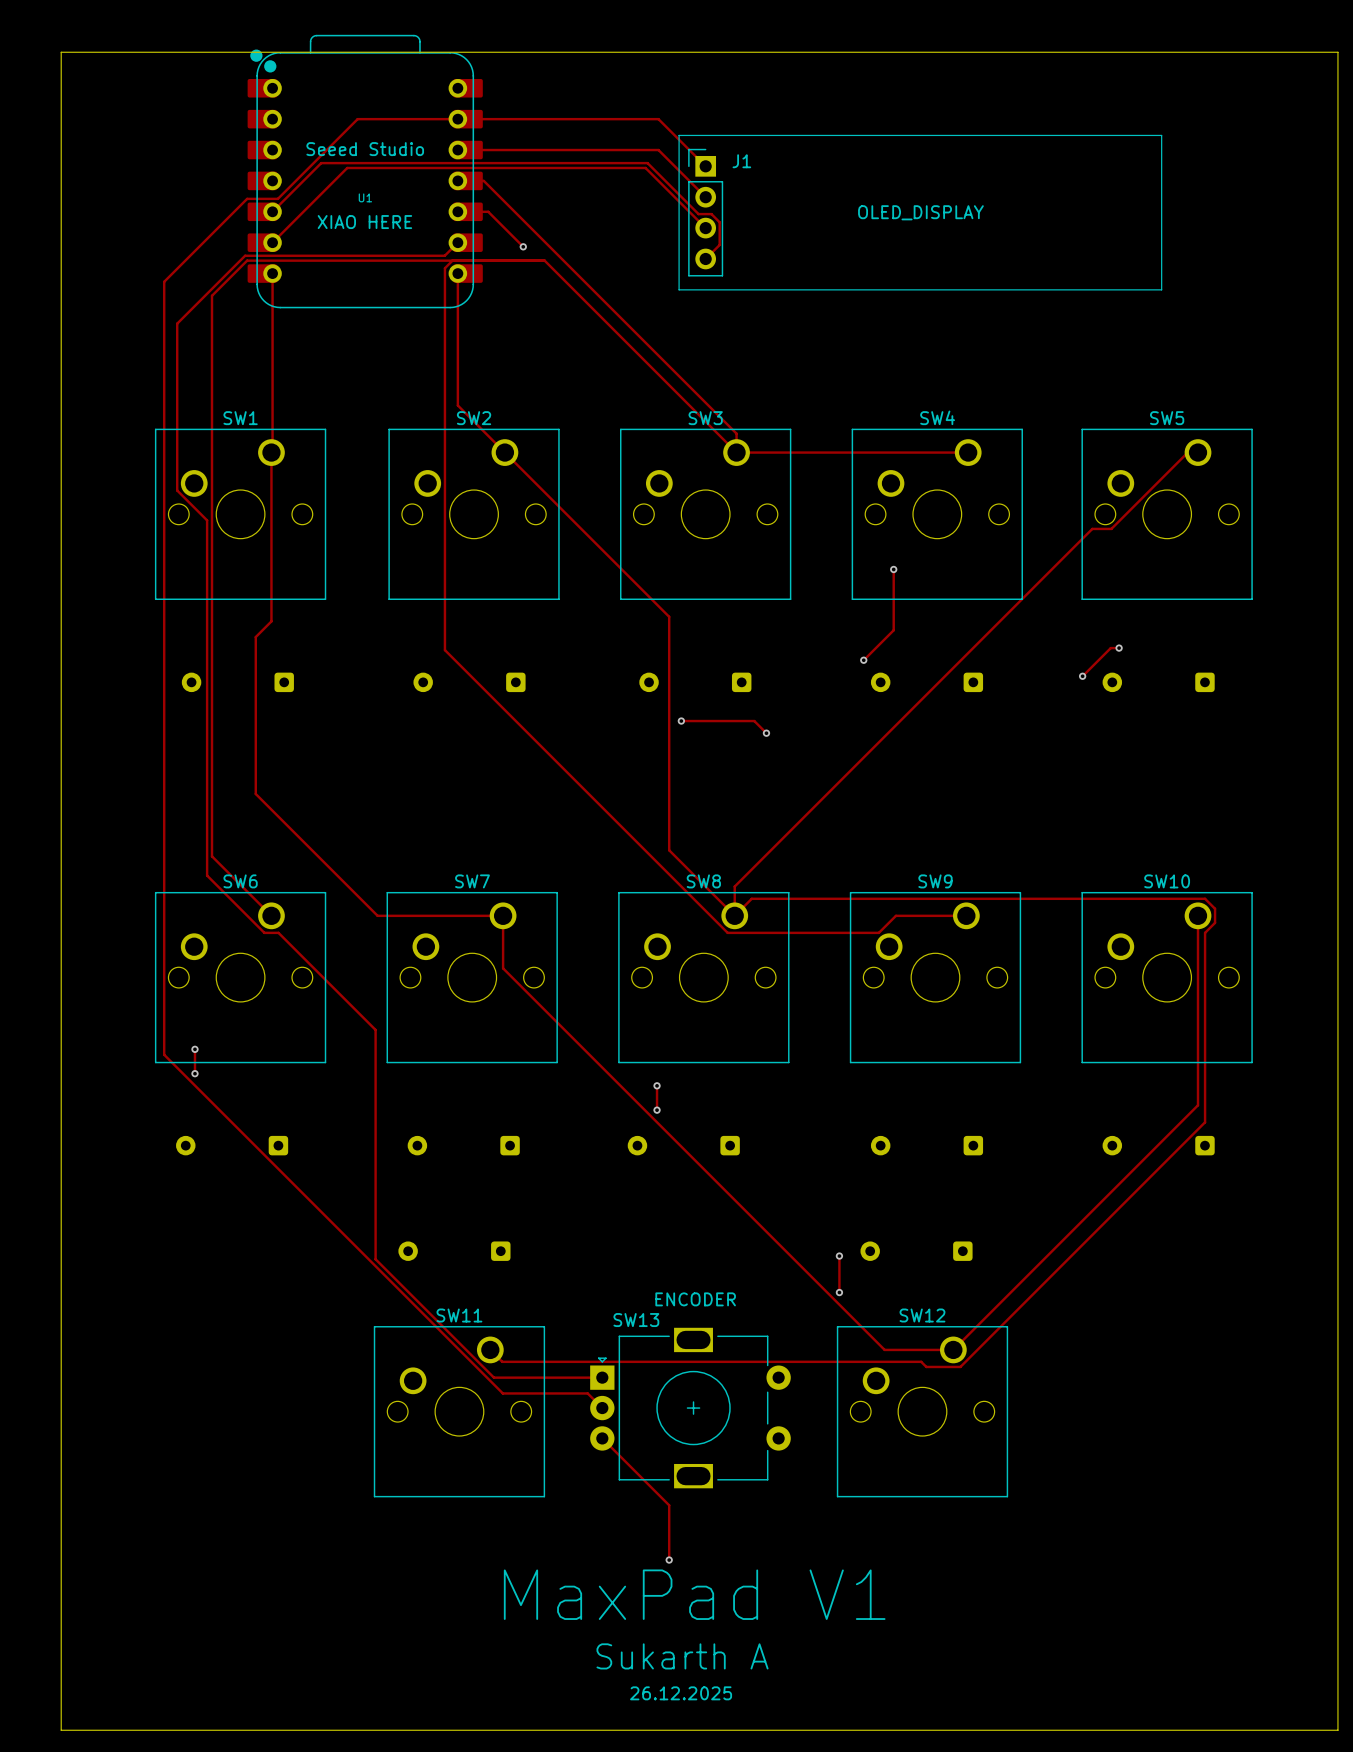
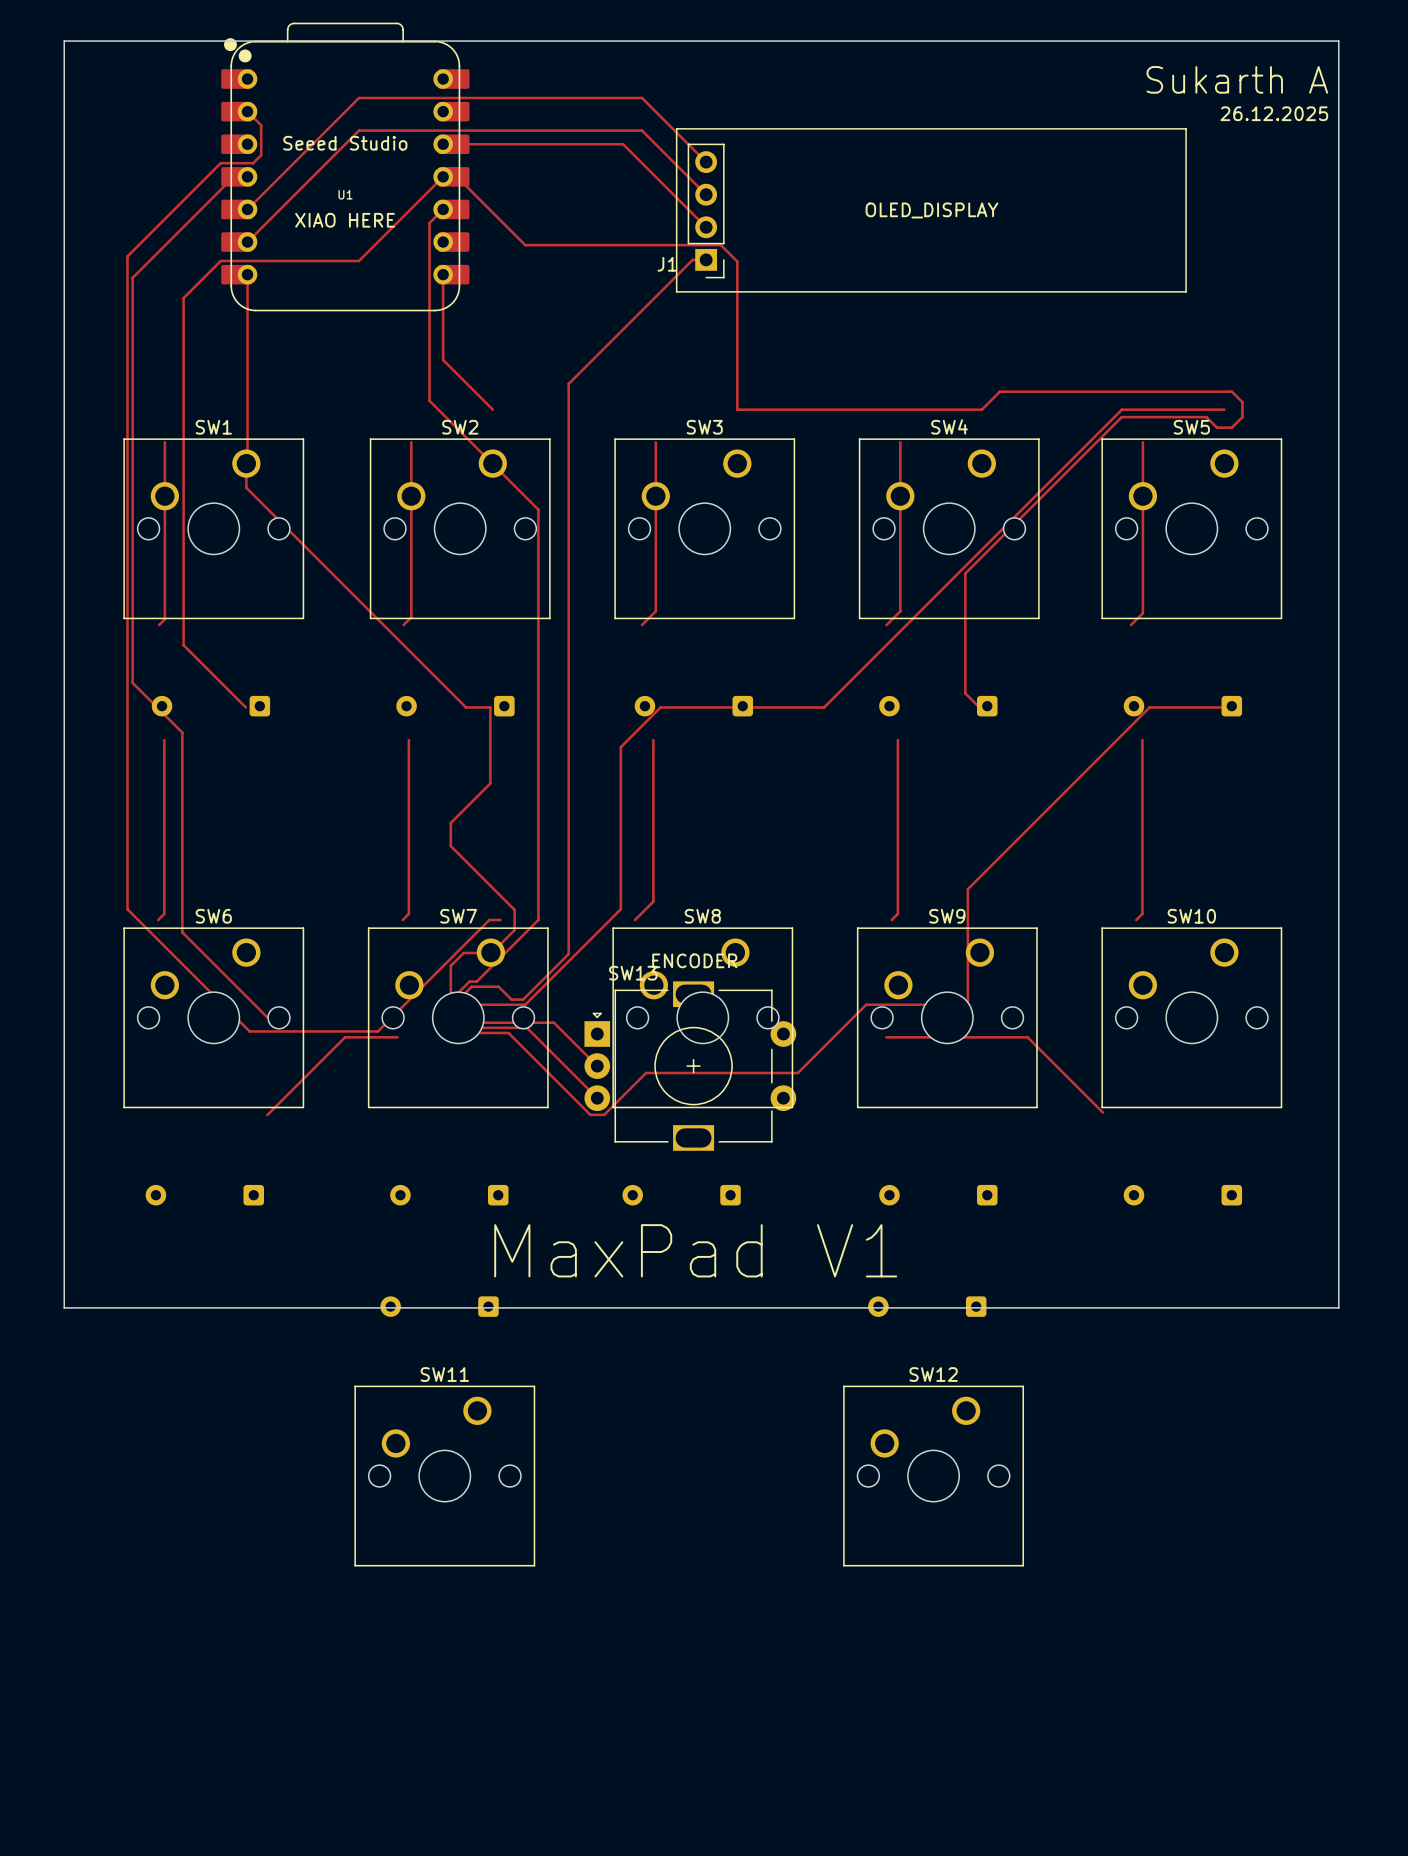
board edge: (98, 52) (61, 52) (61, 1730) (1337, 1730) (1337, 52) (1306, 52) -> (64, 41) (64, 1307) (1338, 1307) (1338, 41)
text: none -> Sukarth A (1237, 79)
track: none -> (247, 111) (261, 125) (261, 155) (253, 163) (220, 163) (127, 256) (127, 909) (249, 1031) (377, 1031) (489, 920) (500, 920)
text: none -> 26.12.2025 (1274, 113)
track: (628, 150) (658, 150) (705, 197) -> (623, 144) (706, 227)
track: (321, 163) (647, 163) (698, 214) (711, 214) (719, 222) (719, 244) (705, 258) -> (298, 158) (358, 98) (642, 98) (706, 162)
track: (705, 166) (658, 119) (357, 119) (277, 198) (247, 198) (164, 281) (164, 1054) (502, 1393) (587, 1393) (602, 1408) -> none
track: (347, 167) (645, 167) (705, 228) -> (326, 163) (358, 130) (642, 130) (706, 194)
track: none -> (247, 176) (233, 176) (132, 277) (132, 682) (182, 732) (182, 932) (267, 1017)
track: (470, 180) (483, 180) (736, 433) (736, 452) -> (456, 176) (525, 245) (720, 245) (737, 261) (737, 409) (981, 409) (999, 391) (1231, 391) (1242, 402) (1242, 417) (1231, 427) (1216, 427) (1206, 417) (1121, 417) (965, 573) (965, 693) (979, 707)
track: (457, 211) (488, 211) (523, 246) -> none
J1 rotation: 0° (705, 212) -> 180° (706, 210)
track: (457, 242) (444, 255) (245, 255) (177, 323) (177, 490) (207, 520) (207, 875) (264, 932) (278, 932) (375, 1029) (375, 1259) (493, 1377) (602, 1377) -> none
via: (523, 246) -> none
track: none -> (706, 259) (692, 259) (568, 383) (568, 954) (523, 999) (511, 999) (498, 986) (471, 986) (461, 997) (461, 1012) (471, 1022) (553, 1022) (597, 1066)
track: (378, 260) (544, 260) (736, 452) -> (358, 261) (443, 176)
track: (452, 260) (444, 268) -> (443, 209) (429, 223) (429, 269)
track: (457, 354) (457, 405) (669, 616) (669, 850) (734, 915) -> (443, 360) (492, 409)
track: (444, 393) (444, 650) (727, 932) (878, 932) (895, 915) (966, 915) -> (429, 400) (538, 509) (538, 919) (476, 981) (469, 981) (455, 995) (455, 1014) (469, 1027) (526, 1027) (597, 1098)
track: none -> (1224, 409) (1121, 409) (824, 707) (660, 707) (620, 747) (620, 909) (525, 1004) (479, 1004)
track: none -> (164, 442) (164, 619) (159, 625)
track: none -> (411, 442) (411, 617) (403, 625)
track: none -> (655, 442) (655, 611) (642, 625)
track: none -> (900, 442) (900, 611) (886, 625)
track: none -> (1142, 442) (1142, 613) (1131, 625)
track: (736, 452) (968, 452) -> none
track: (1198, 452) (1187, 452) (1111, 528) (1092, 528) (734, 886) (734, 915) -> none
track: (271, 475) (271, 621) (255, 637) (255, 793) (377, 915) (503, 915) (503, 968) (884, 1349) (953, 1349) (1198, 1105) (1198, 915) -> (246, 487) (466, 707) (490, 707) (490, 783) (450, 823) (450, 846) (514, 909) (514, 930) (491, 952) (463, 952) (450, 965) (450, 1016) (467, 1032) (508, 1032) (590, 1114) (604, 1114) (646, 1073) (797, 1073) (866, 1004) (967, 1004) (967, 889) (1149, 707) (1223, 707)
track: (893, 569) (893, 630) (863, 660) -> none
via: (893, 569) -> none
track: (211, 624) (211, 856) (271, 915) -> (183, 645) (245, 707)
track: (1119, 648) (1110, 648) (1082, 676) -> none
via: (1119, 648) -> none
via: (863, 660) -> none
via: (1082, 676) -> none
track: none -> (164, 740) (164, 913) (158, 920)
track: none -> (408, 740) (408, 913) (402, 920)
track: none -> (653, 740) (653, 901) (635, 920)
track: none -> (897, 740) (897, 913) (891, 920)
track: none -> (1142, 740) (1142, 913) (1136, 920)
track: (681, 721) (754, 721) (766, 733) -> none
via: (681, 721) -> none
via: (766, 733) -> none
track: (734, 915) (751, 898) (1205, 898) (1215, 908) (1215, 922) (1205, 932) (1205, 1122) (960, 1366) (926, 1366) (921, 1361) (502, 1361) (490, 1349) -> none
text: none -> ENCODER (694, 960)
track: none -> (397, 1037) (345, 1037) (267, 1115)
track: none -> (886, 1037) (1027, 1037) (1102, 1112)
track: (194, 1049) (194, 1073) -> none
via: (194, 1049) -> none
via: (194, 1073) -> none
track: (657, 1085) (657, 1110) -> none
via: (657, 1085) -> none
via: (657, 1110) -> none
text: none -> MaxPad V1 (695, 1250)
track: (839, 1256) (839, 1292) -> none
via: (839, 1256) -> none
via: (839, 1292) -> none
text: ENCODER (695, 1299) -> none
SW13 position: (690, 1408) -> (690, 1066)
track: (602, 1438) (669, 1505) (669, 1560) -> none
via: (669, 1560) -> none
text: MaxPad V1 (694, 1594) -> none
text: Sukarth A (682, 1656) -> none
text: 26.12.2025 (681, 1693) -> none

